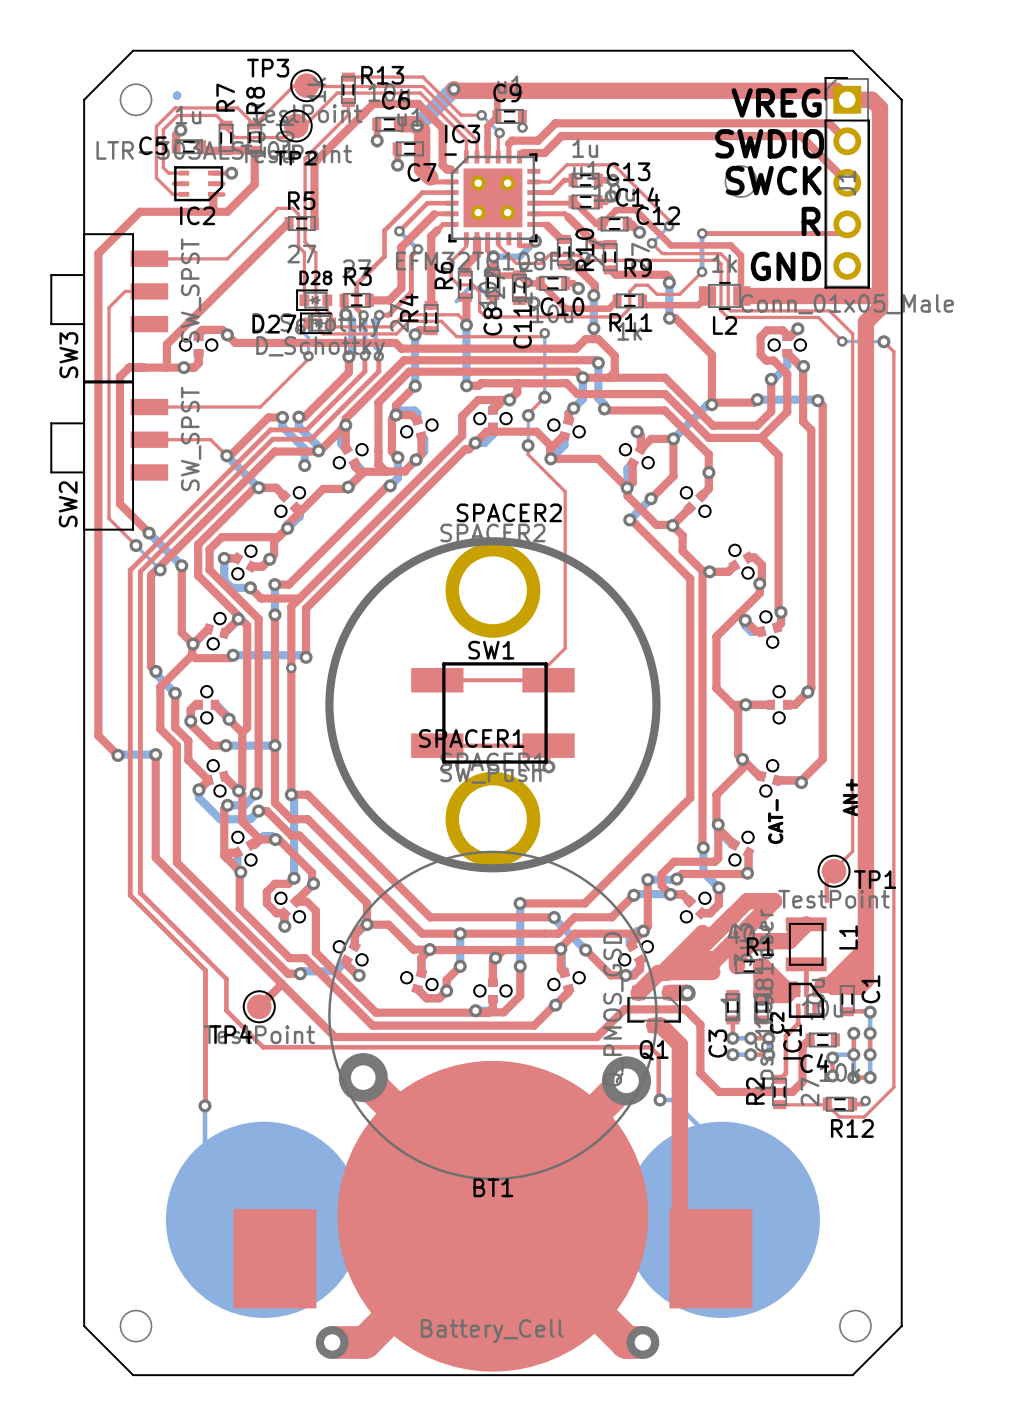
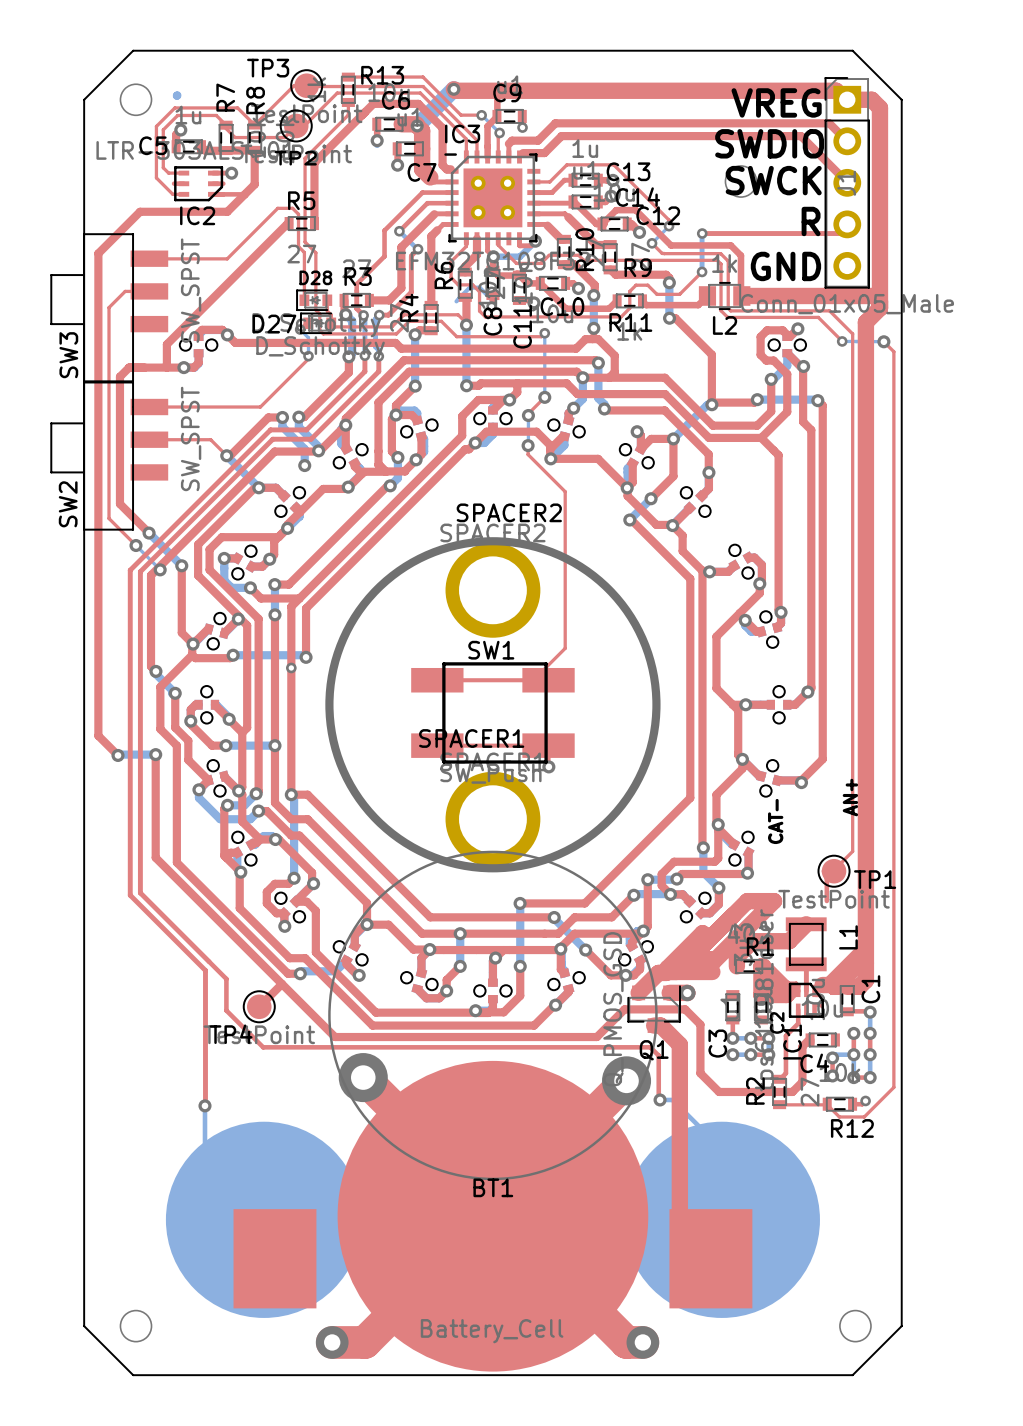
top track: none -> (213, 194) (244, 194)
top track: (213, 197) (213, 211) -> none

